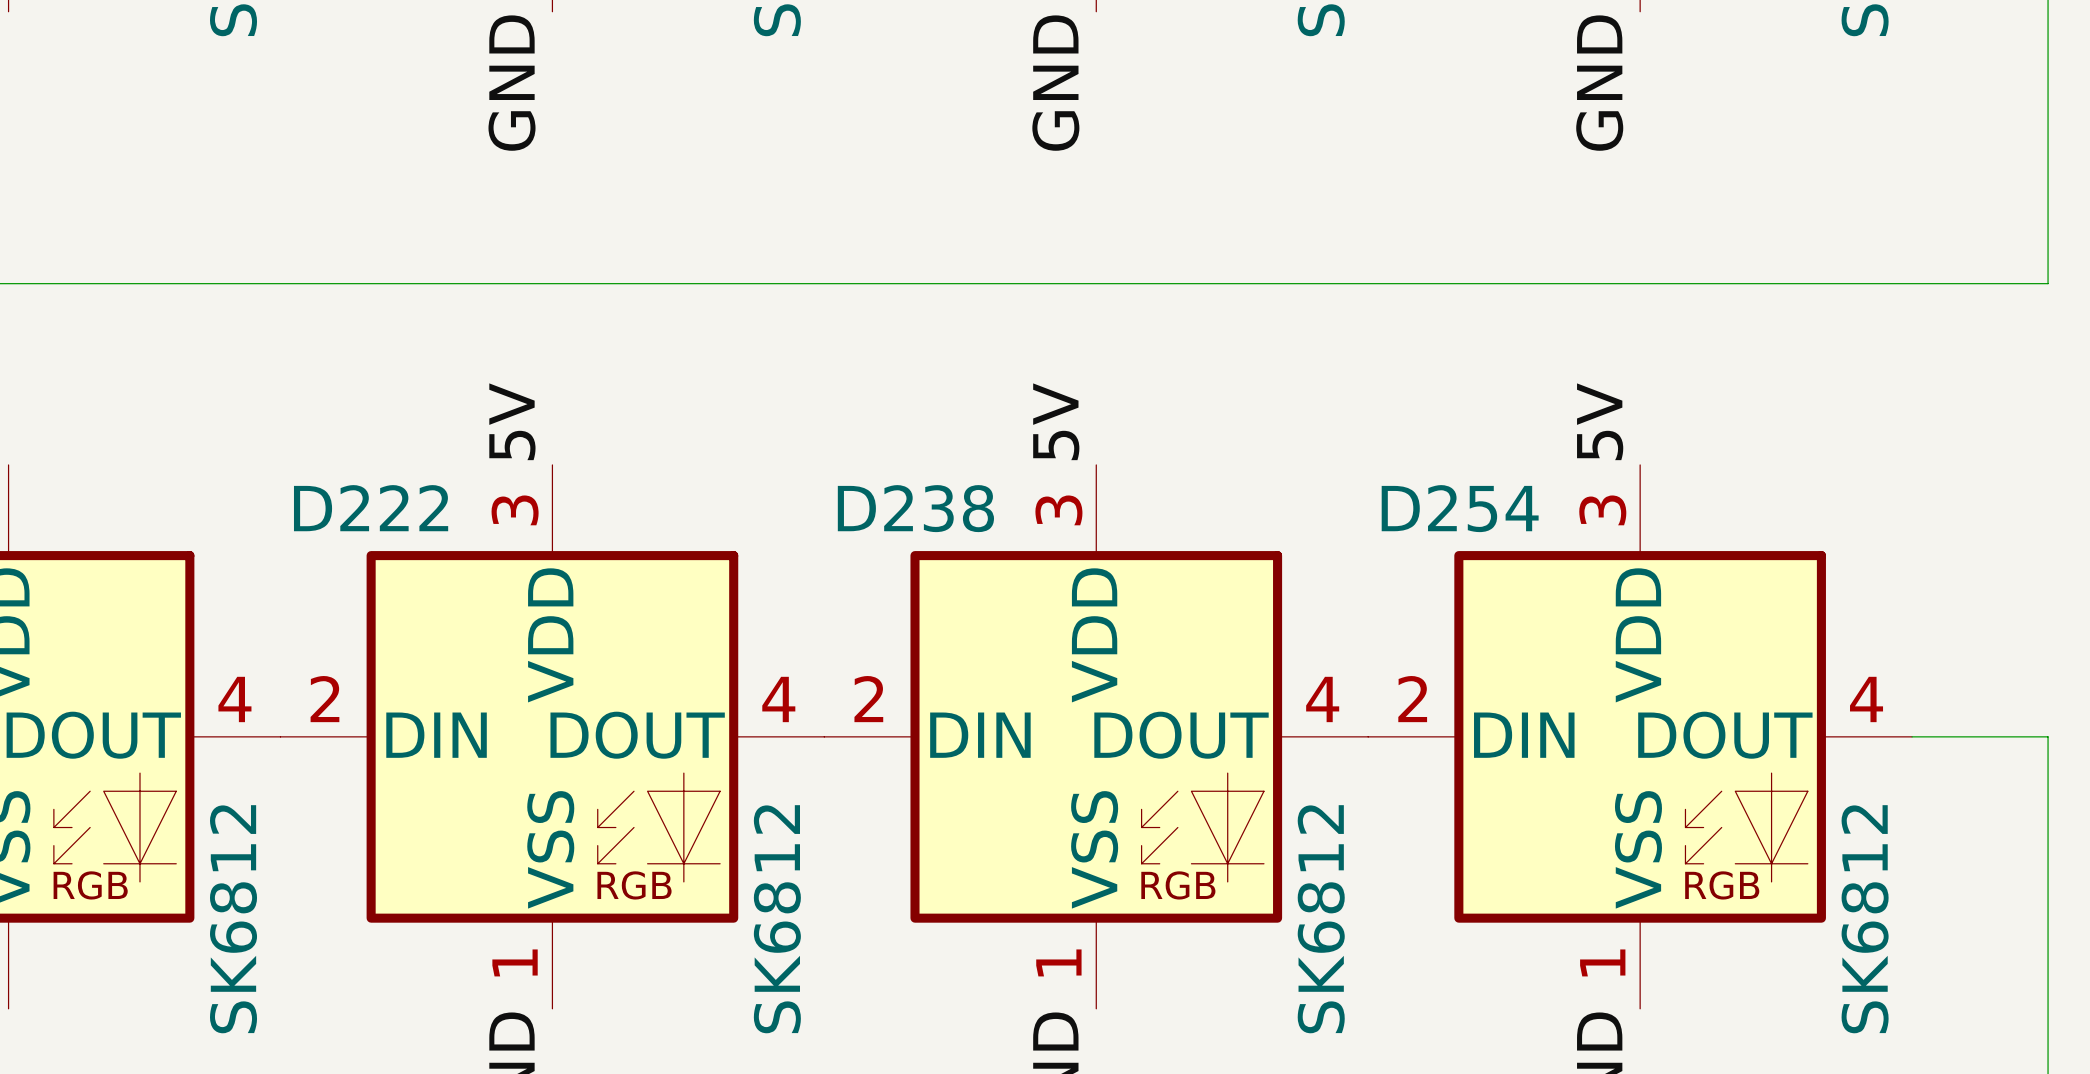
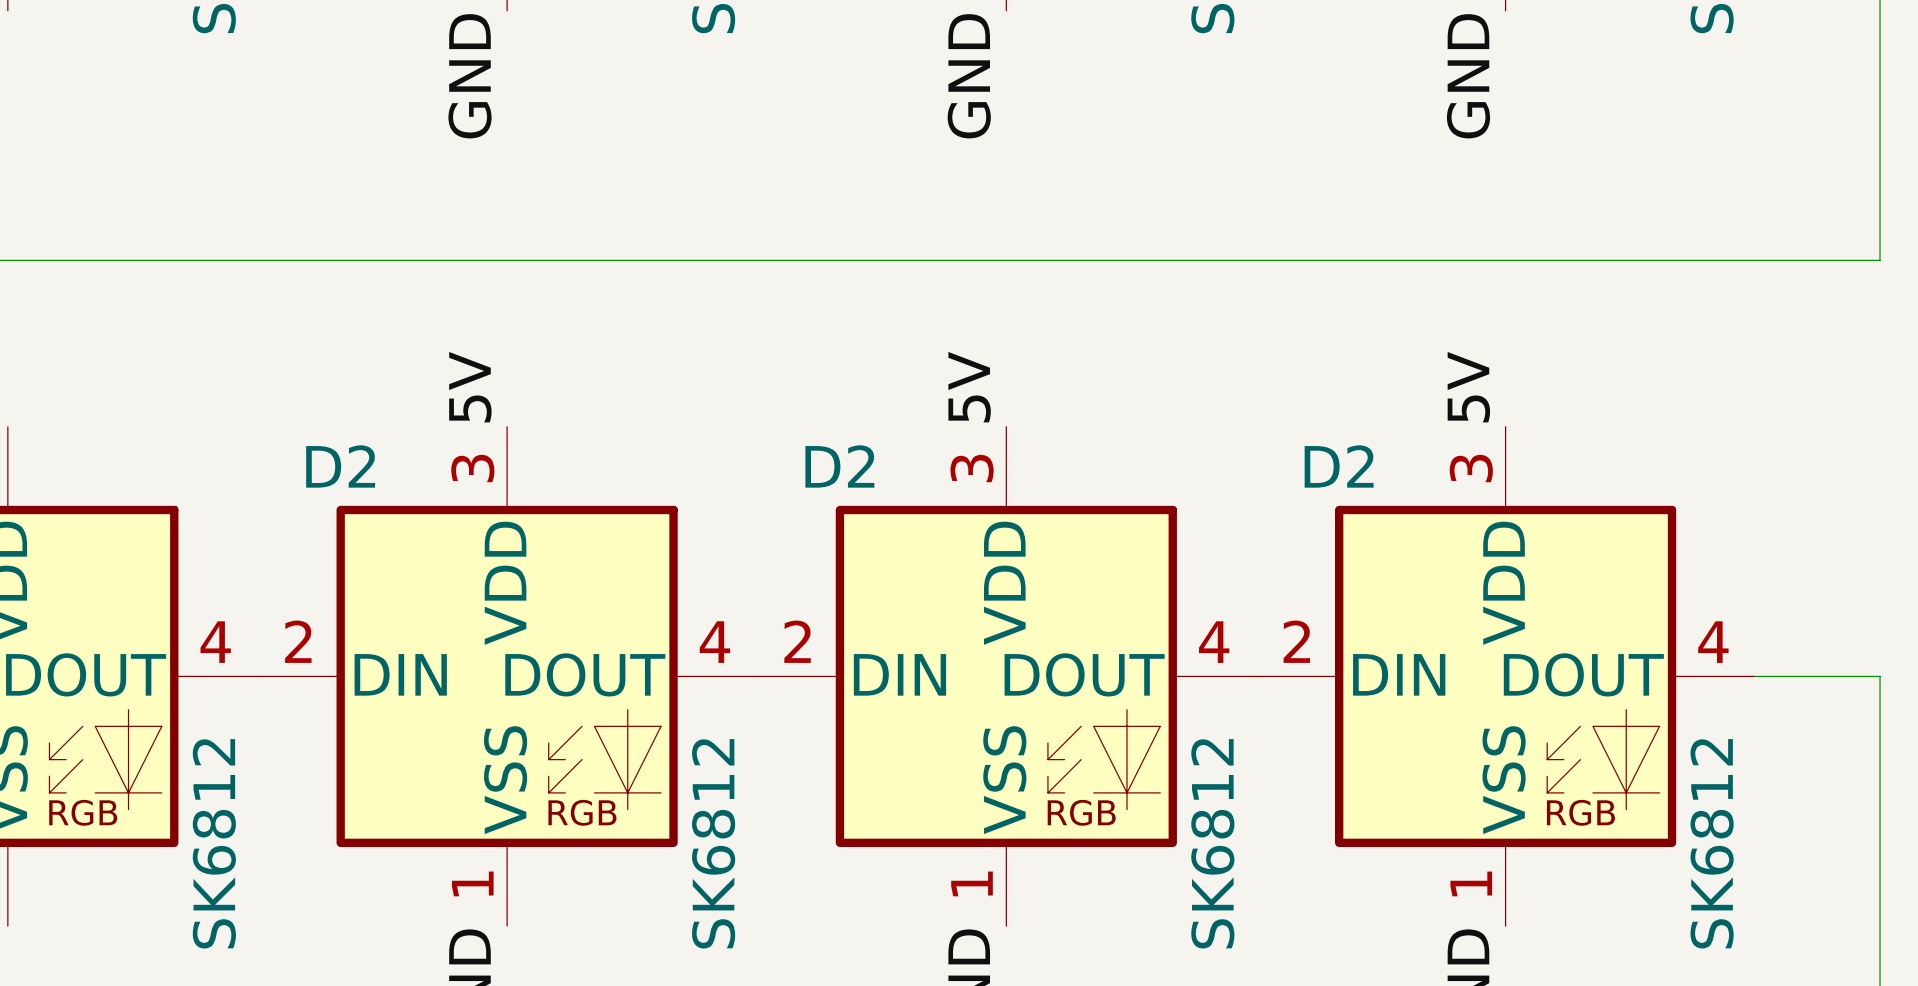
D222 name: D222 (371, 508) -> D2 (340, 466)
D238 name: D238 (915, 508) -> D2 (839, 466)
D254 name: D254 (1460, 508) -> D2 (1339, 466)

